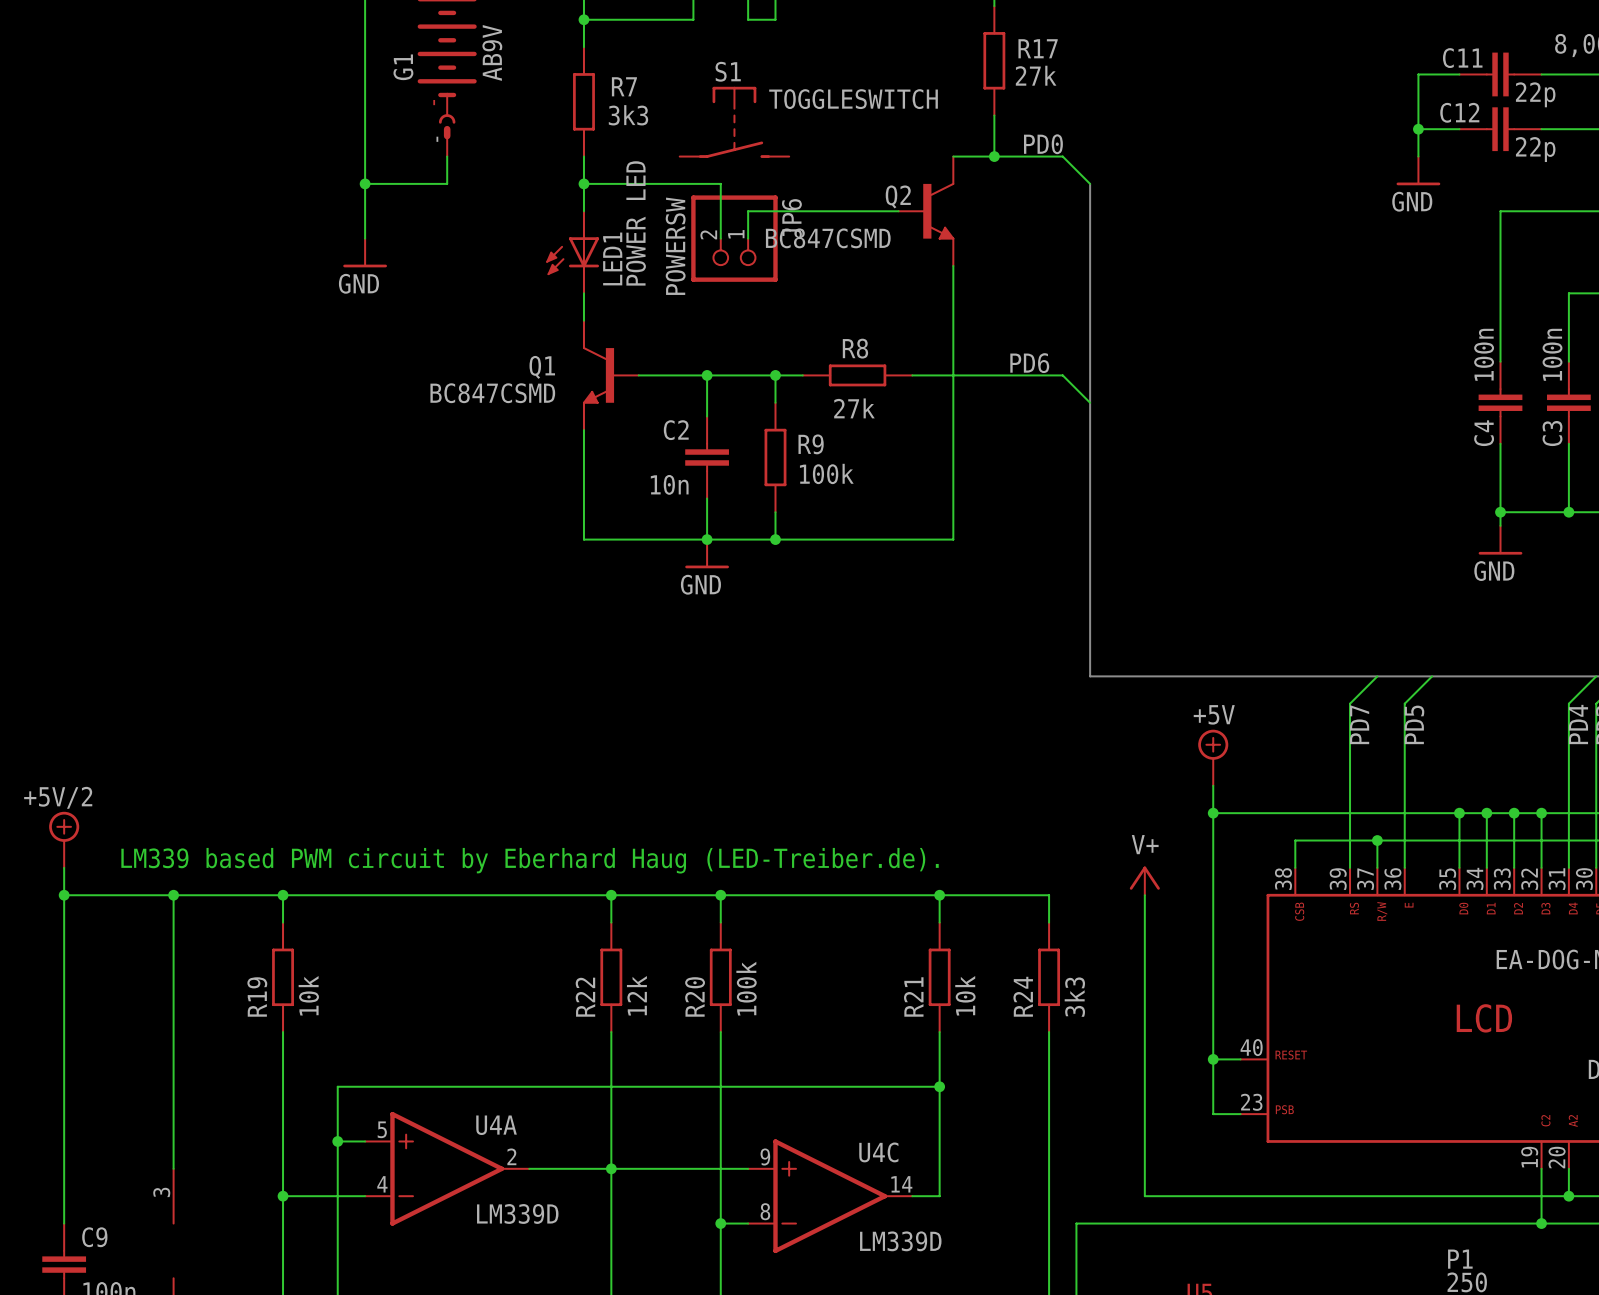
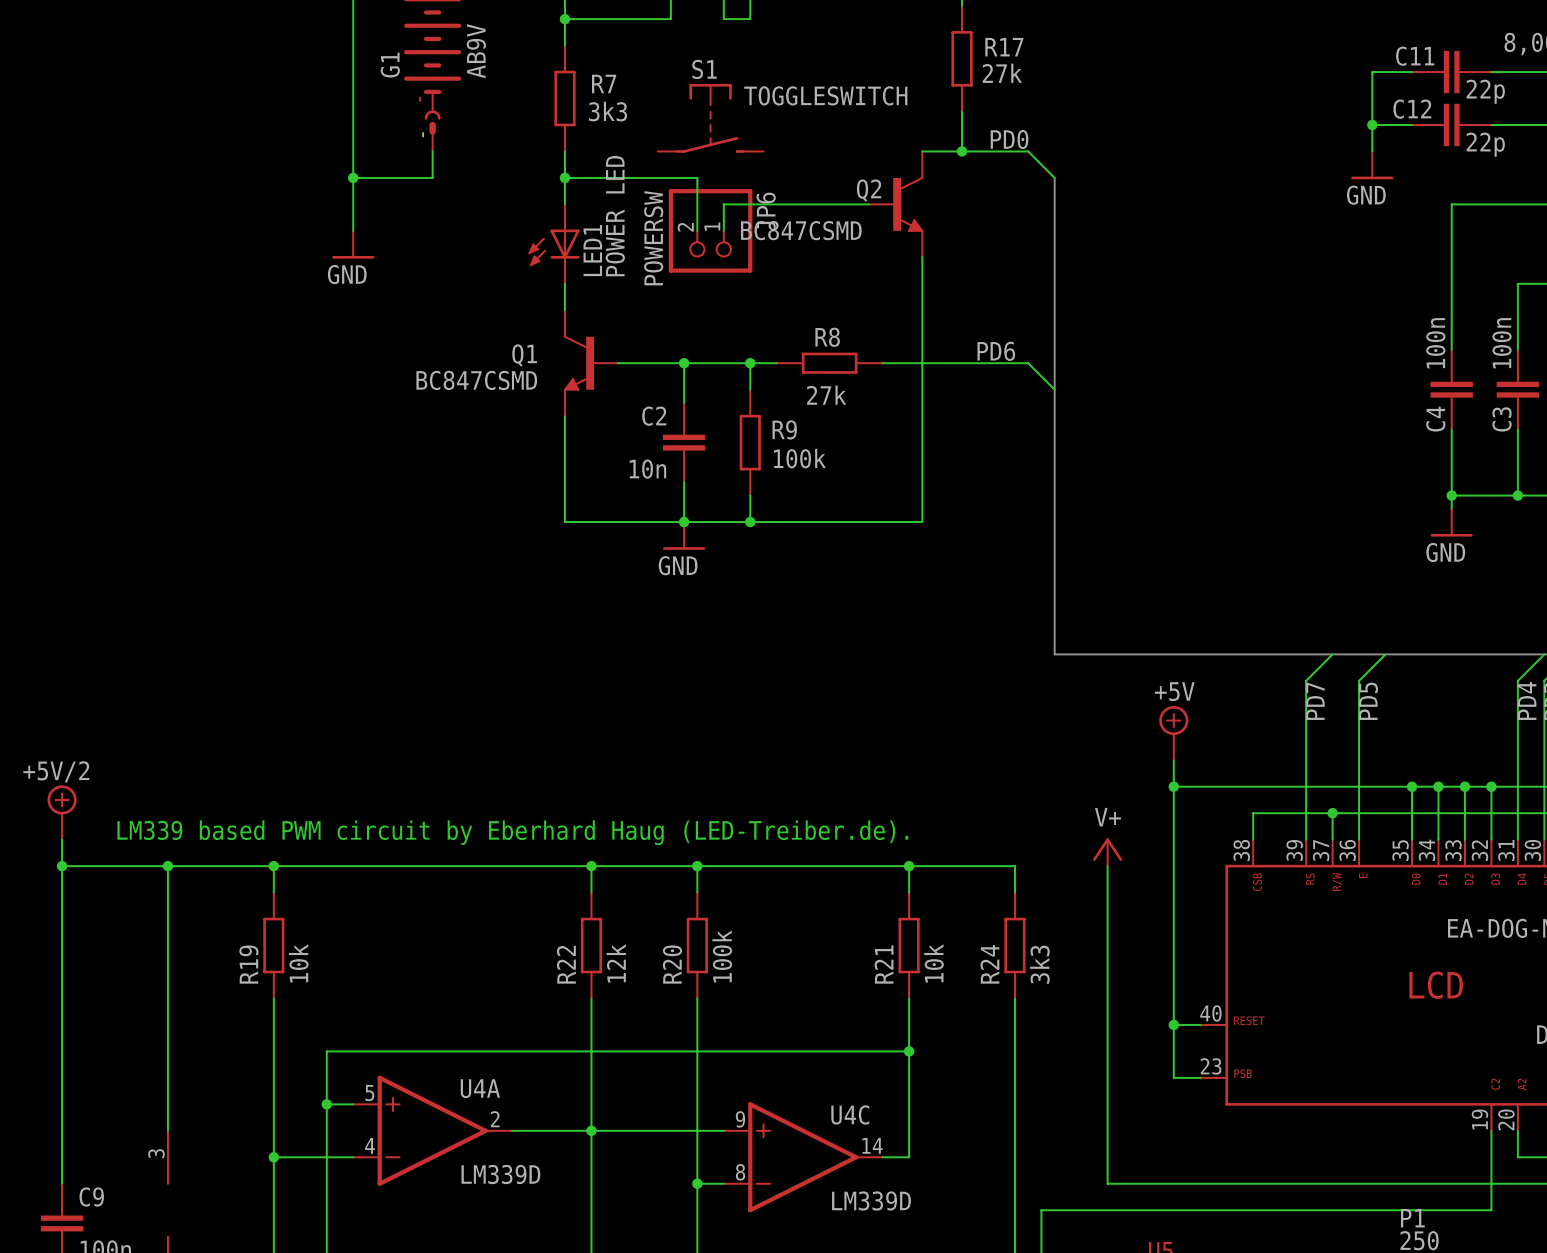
wire: (1144, 1196) (1568, 1196) -> none
junction: (1568, 1196) -> none
wire: (1144, 1223) (1076, 1223) (1076, 1250) -> (1107, 1183) (1107, 1157)
wire: none -> (1491, 1183) (1491, 1210) (1041, 1210)
junction: (1541, 1223) -> none

